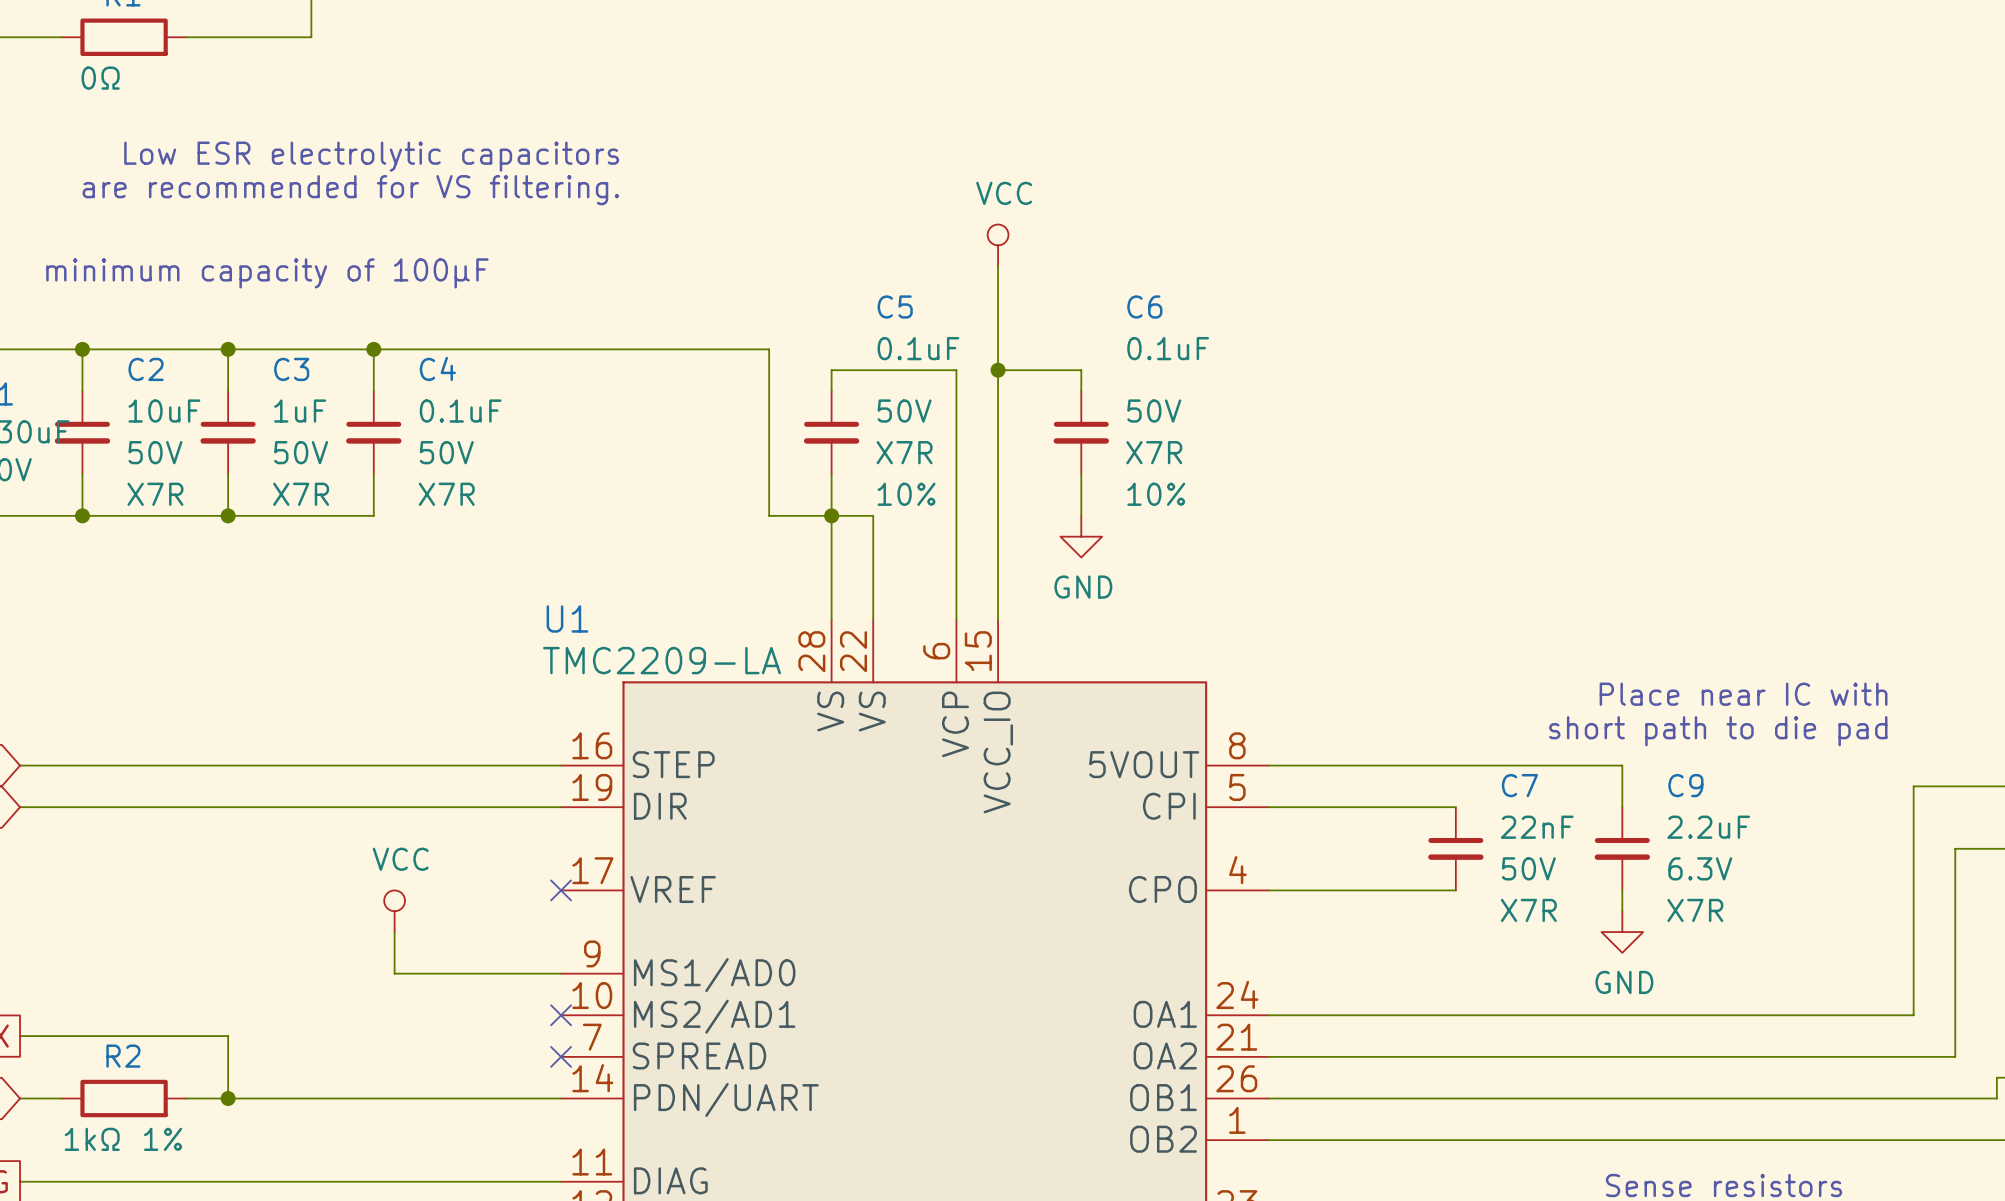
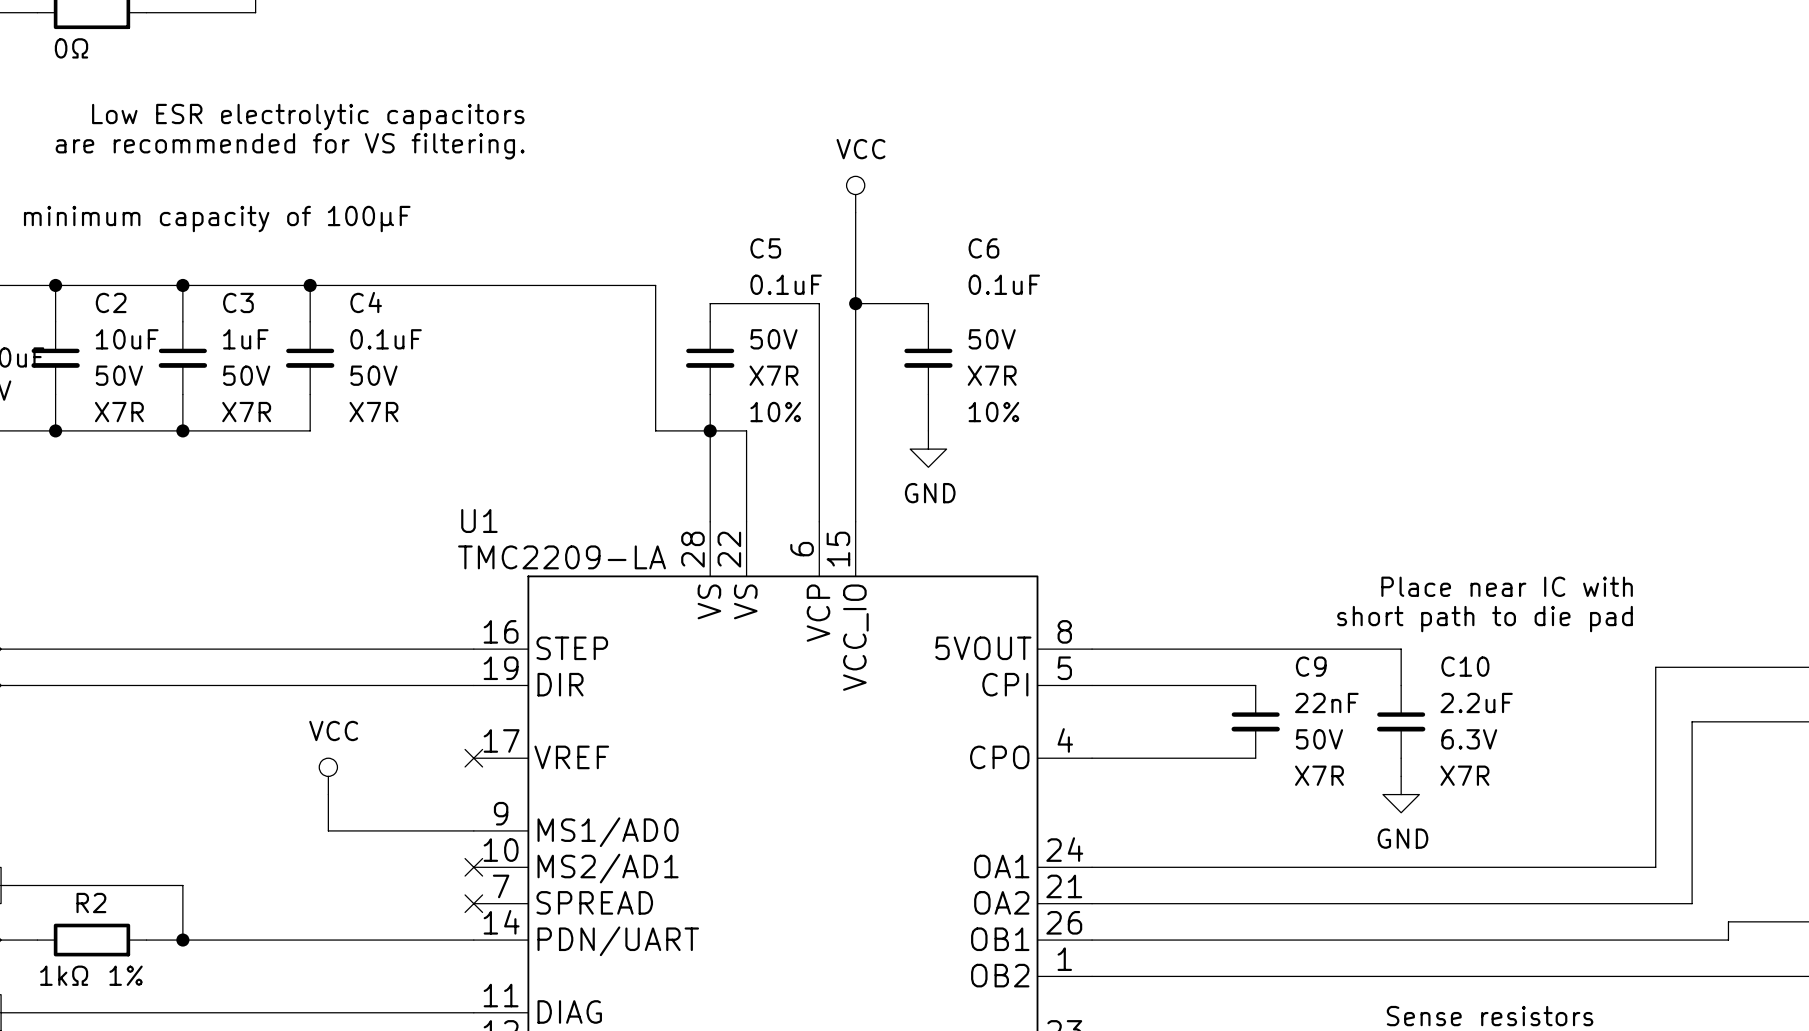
C7 name: C7 (1519, 785) -> C9 (1311, 666)
C9 name: C9 (1685, 785) -> C10 (1465, 666)

